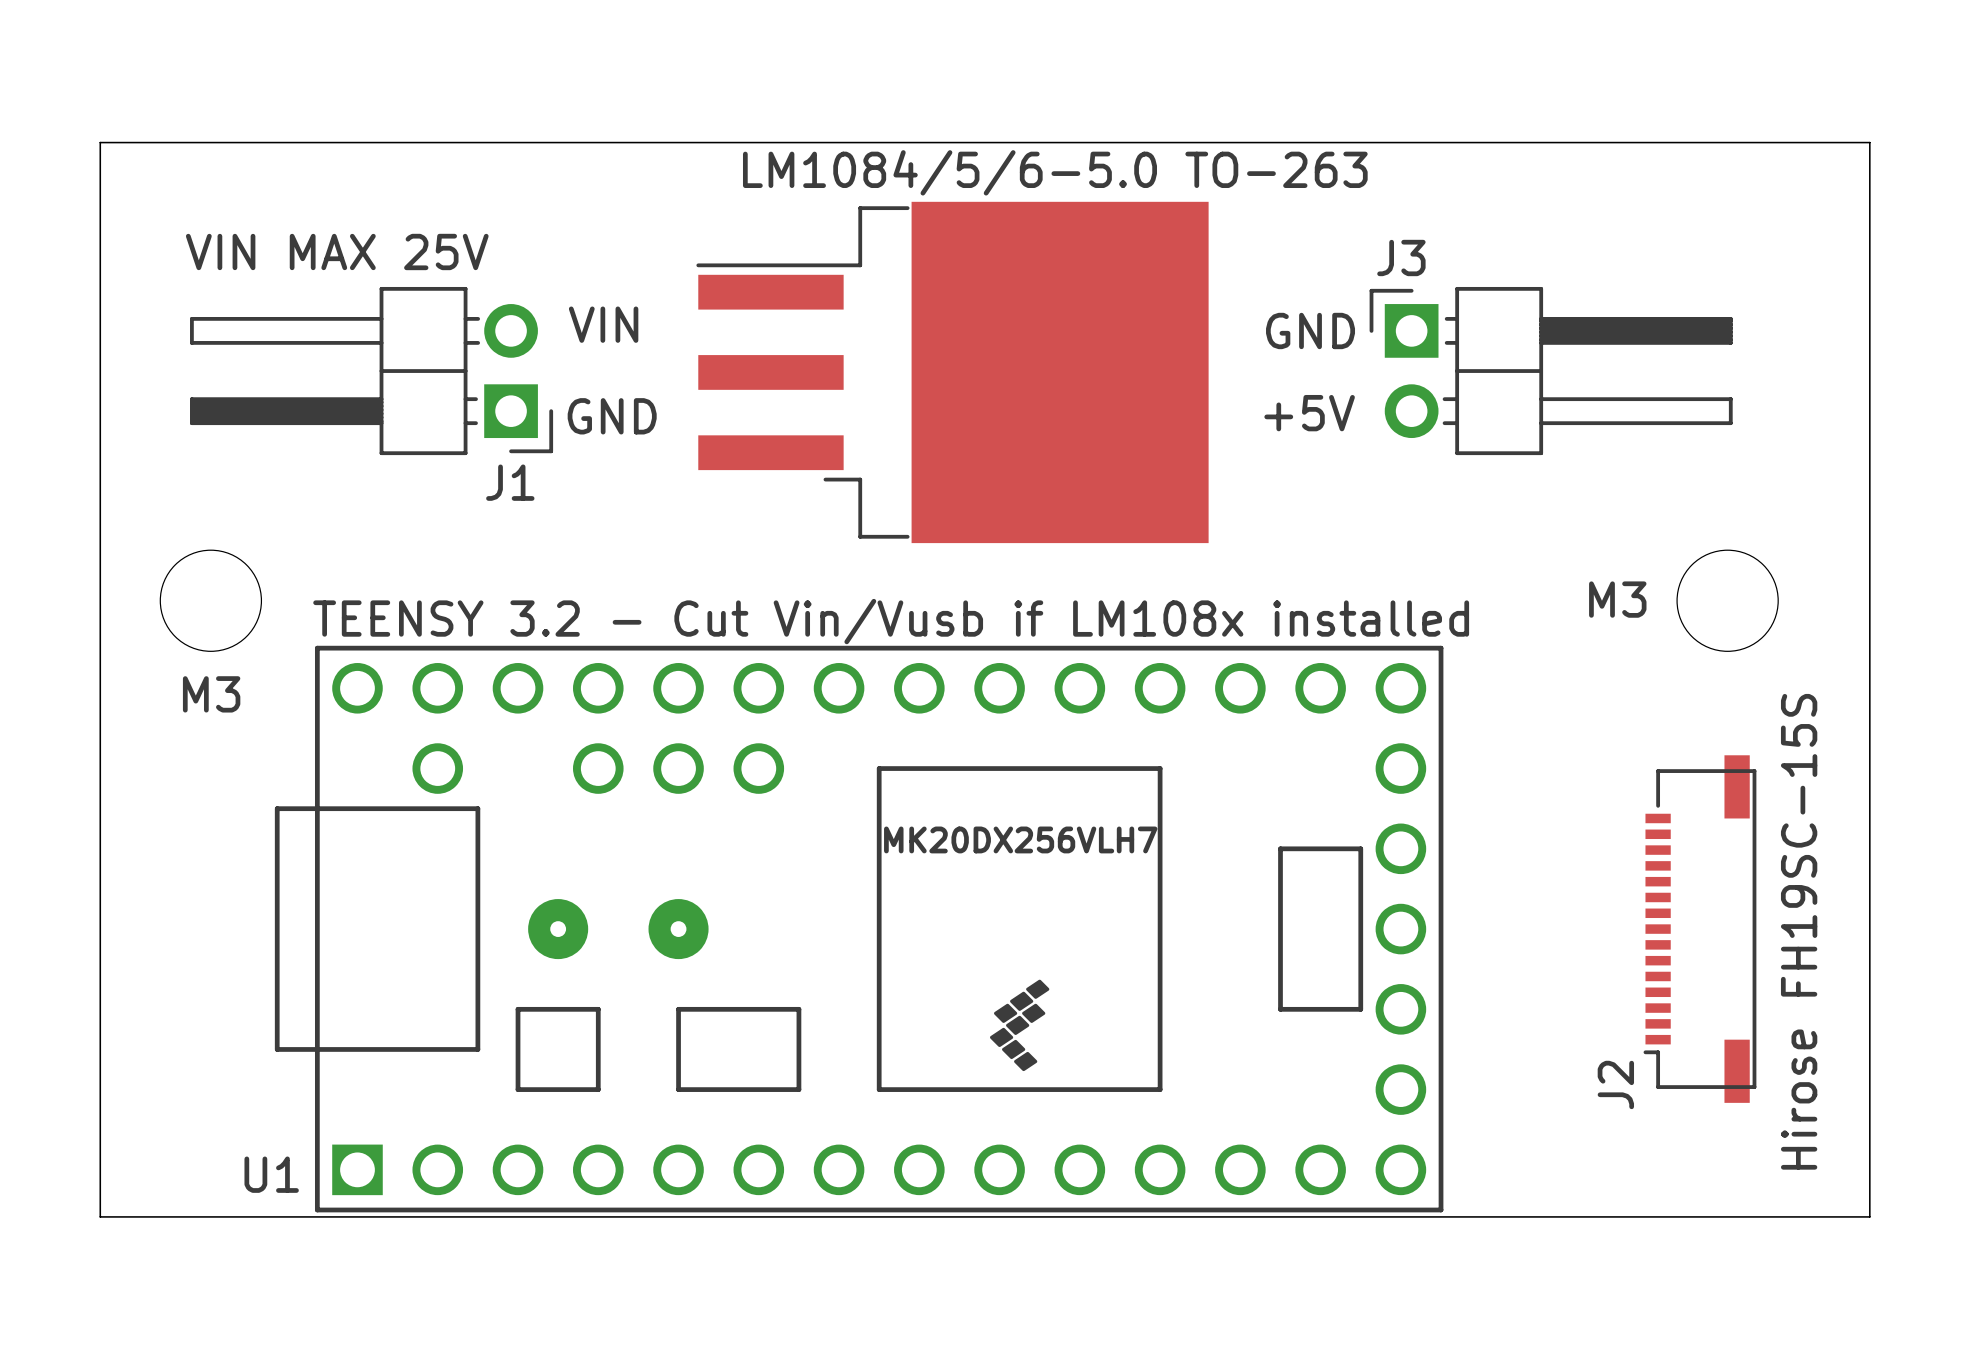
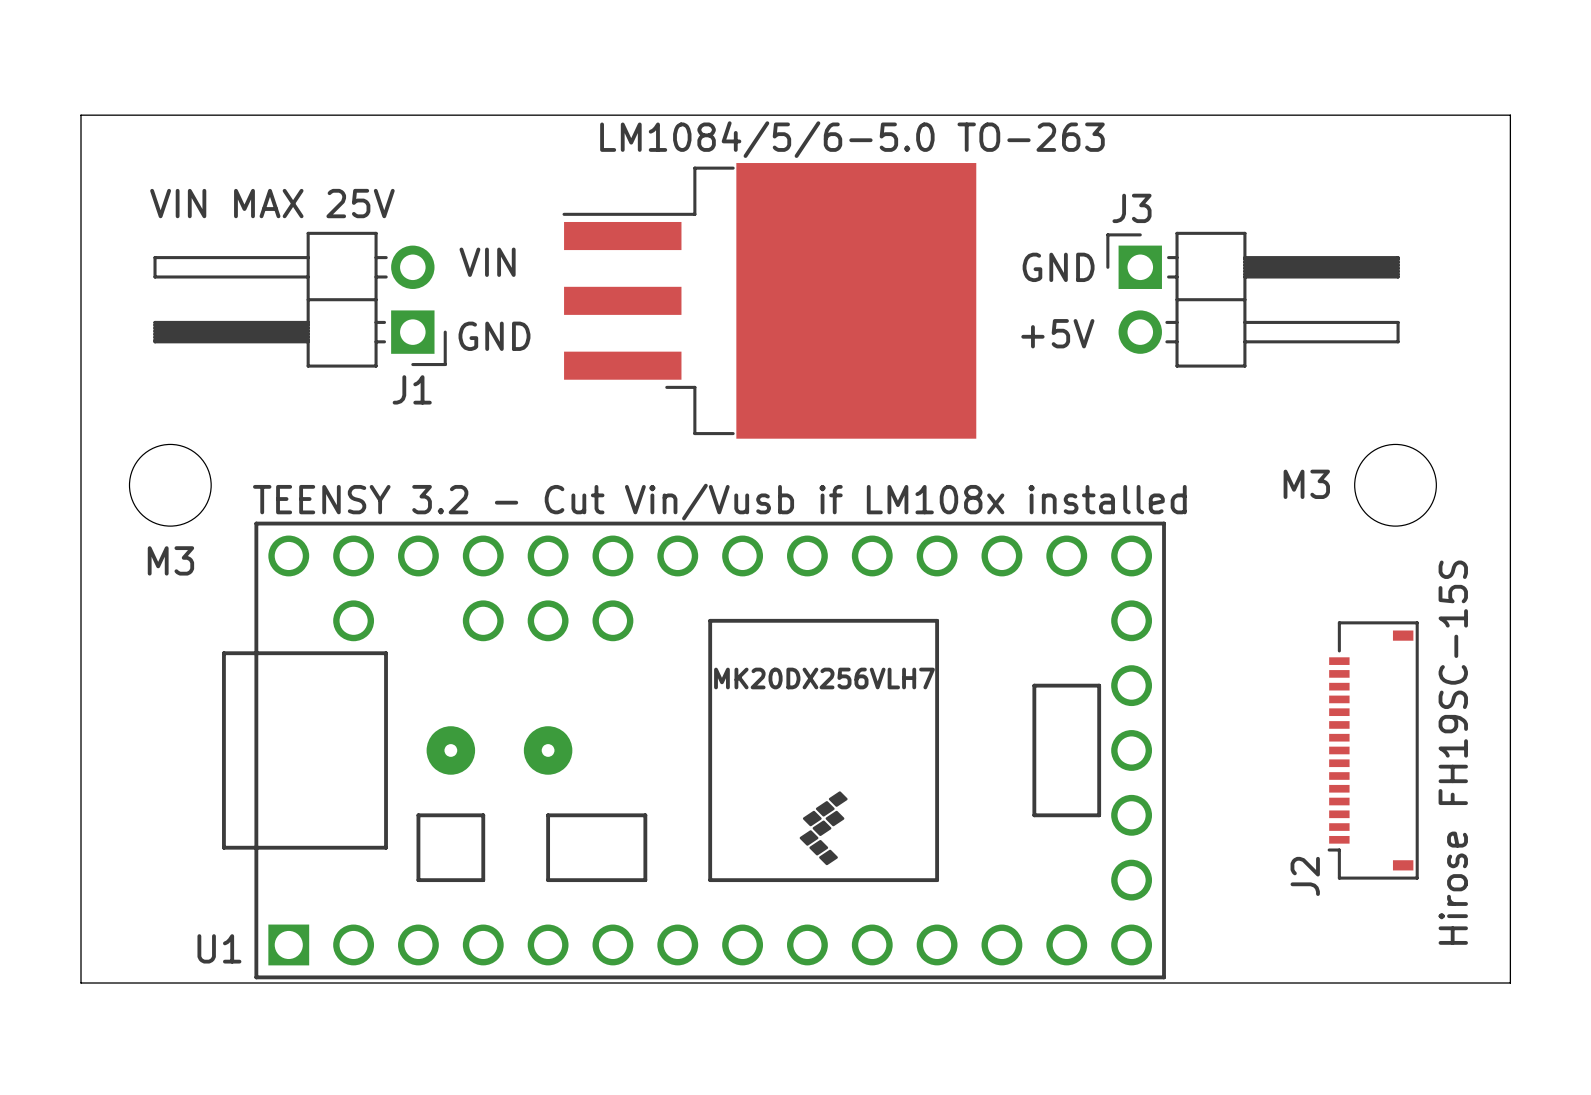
J2 footprint: [1643, 755, 1757, 1103] -> [1327, 621, 1419, 880]

